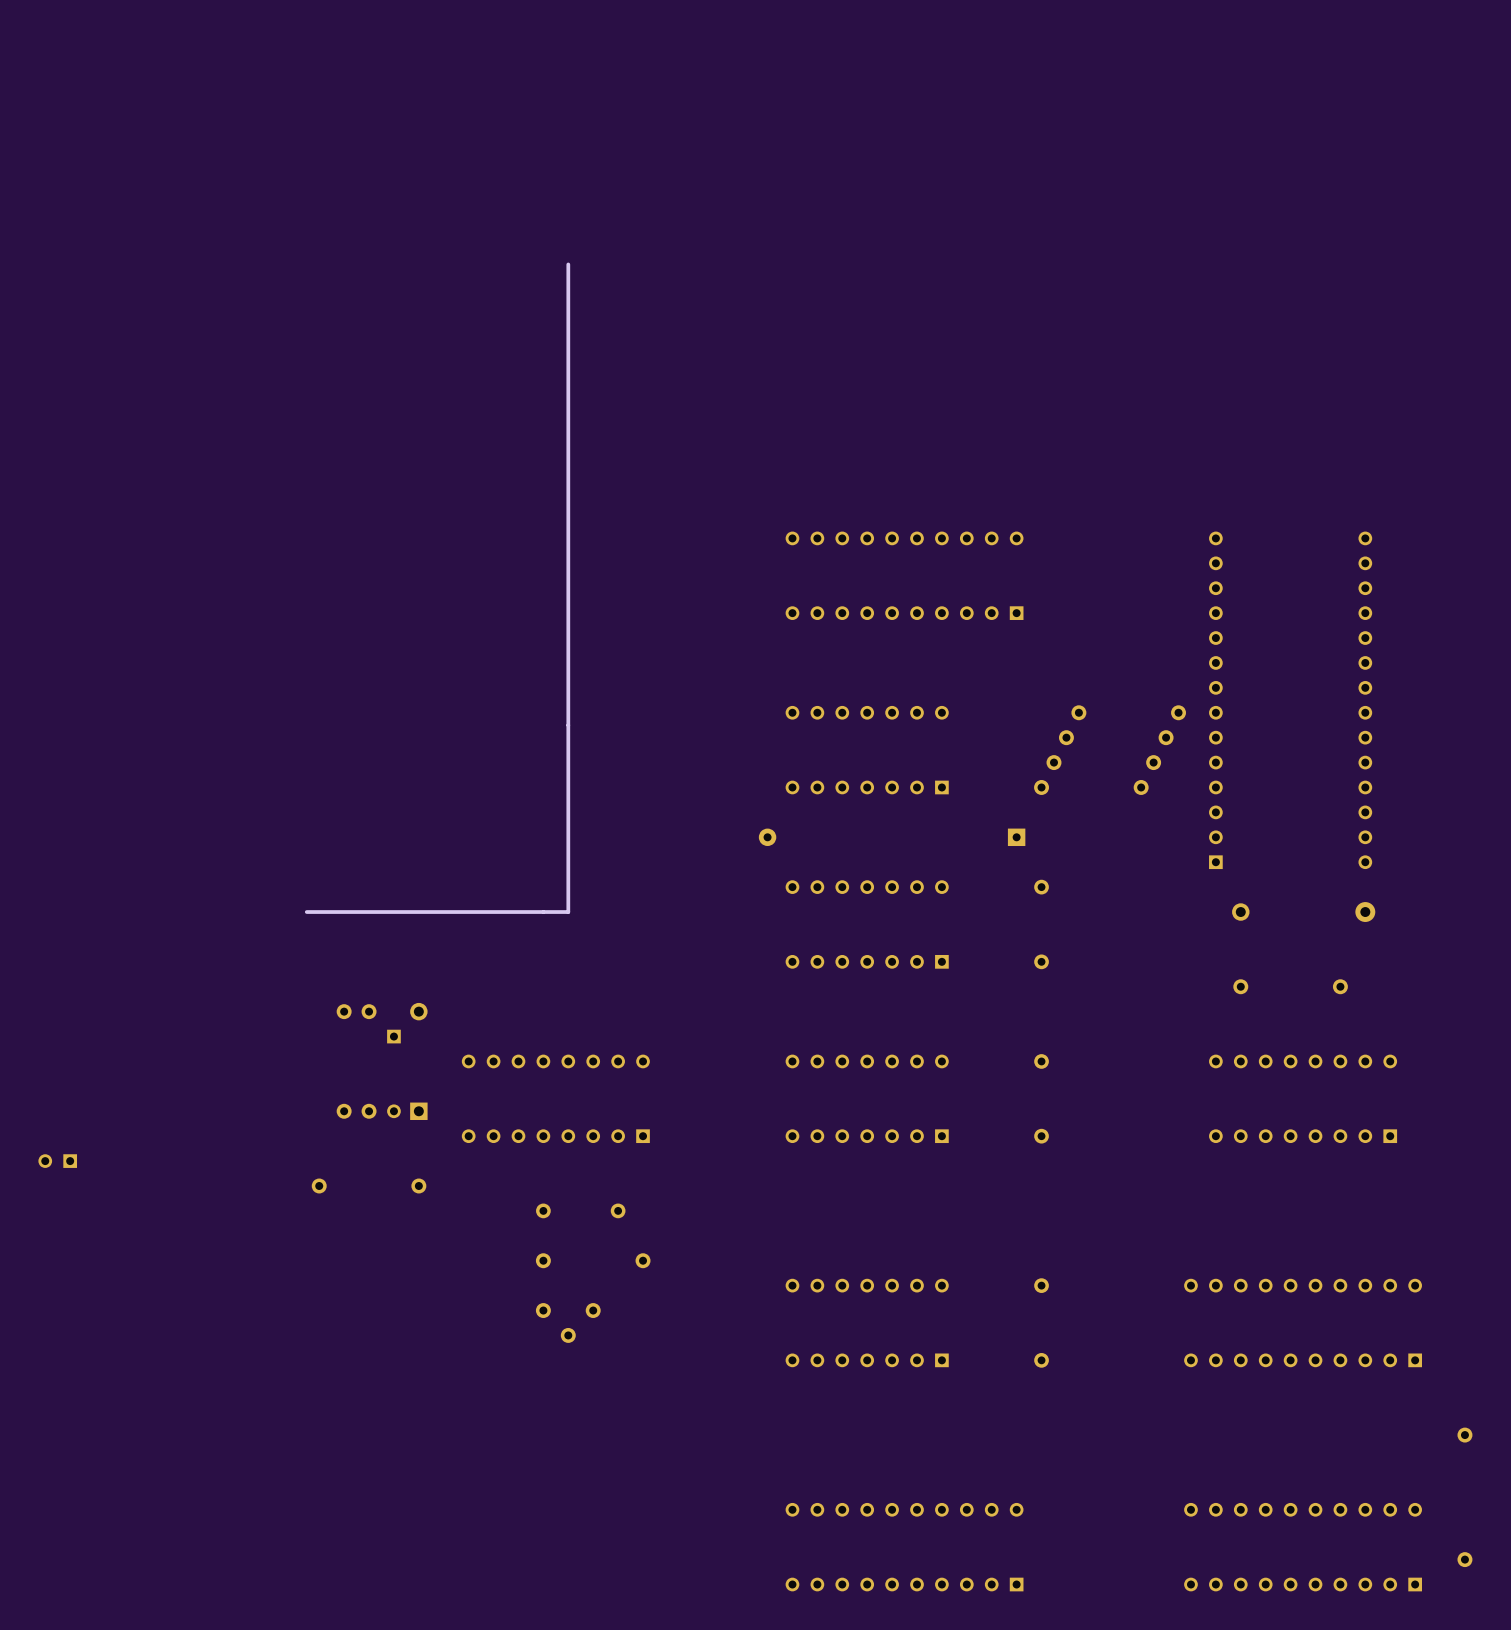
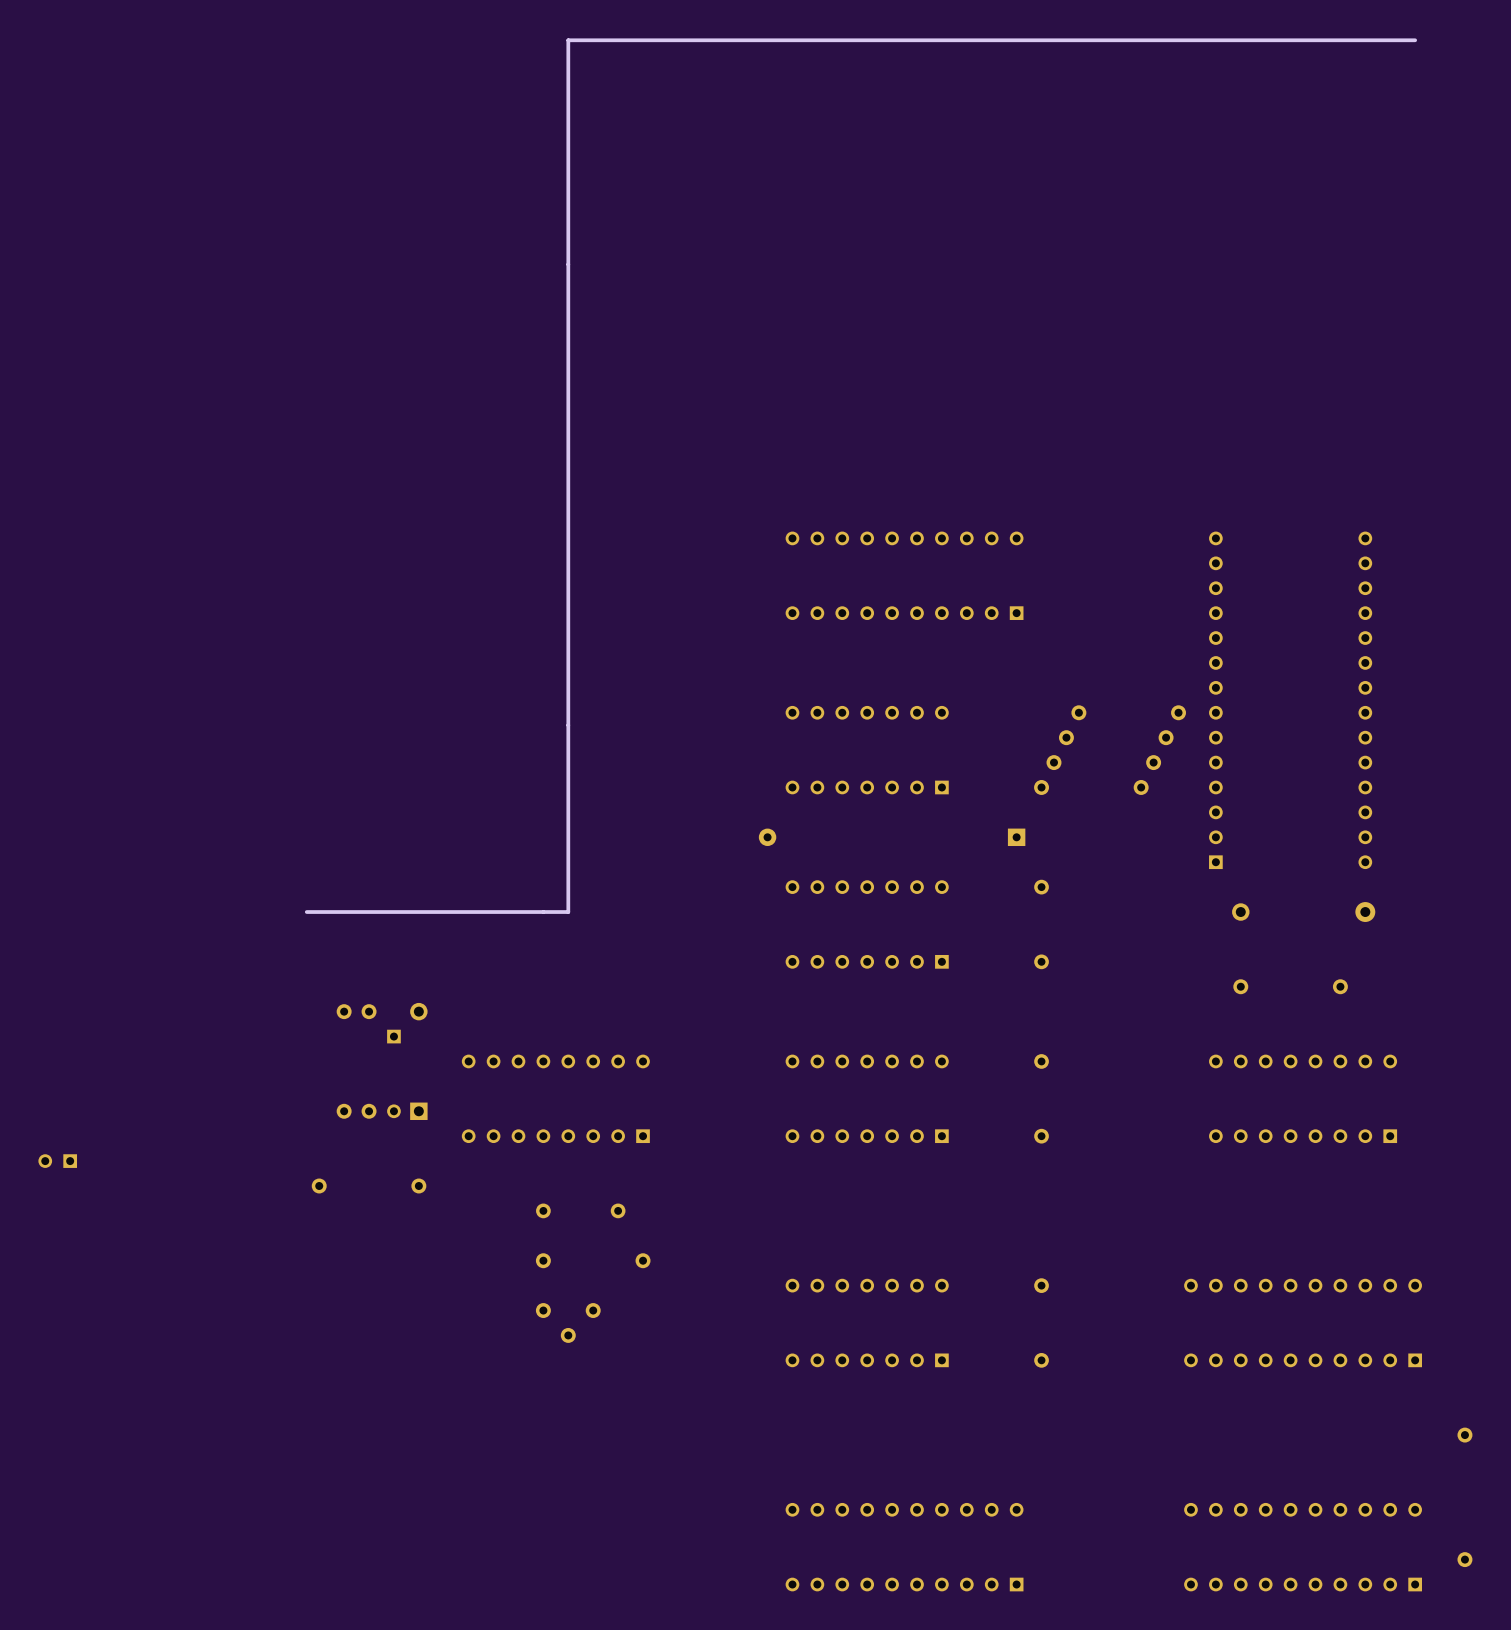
board edge: none -> (1415, 40) (568, 40) (568, 264)

